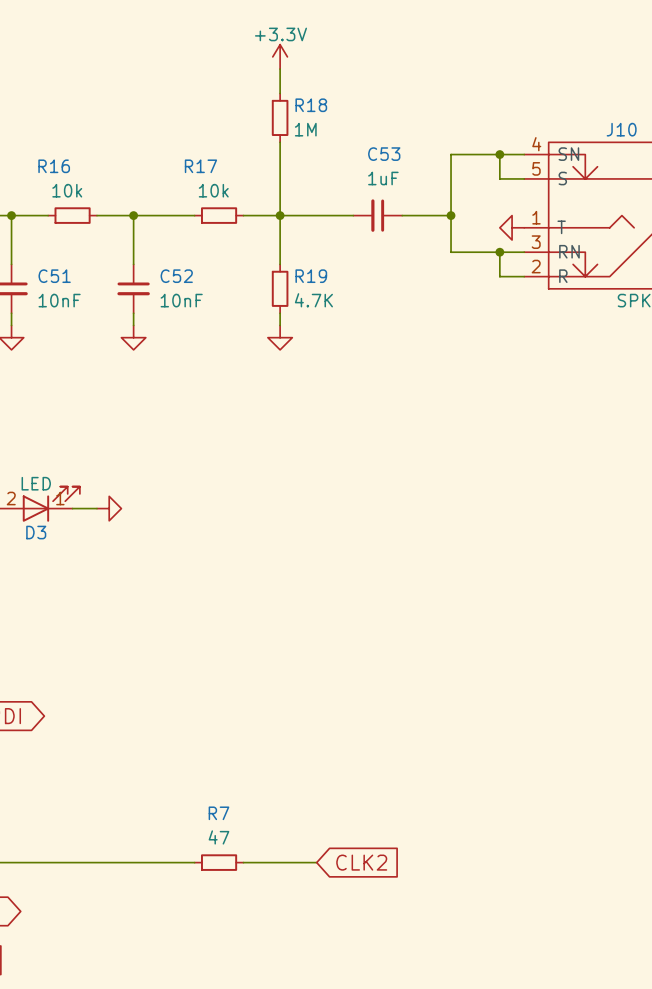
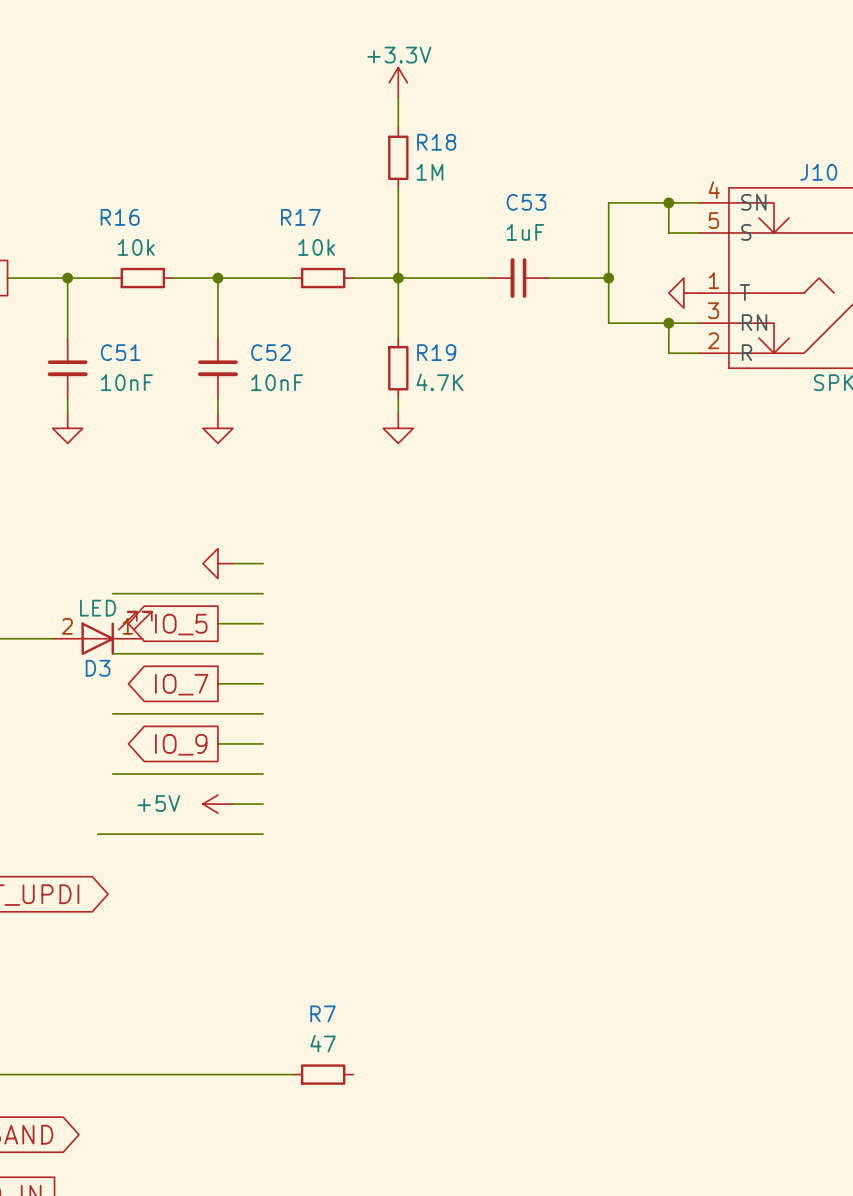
wire: none -> (112, 593) (263, 593)
wire: none -> (217, 623) (263, 623)
global label: none -> IO_5 (181, 624)
wire: (72, 508) (96, 508) -> (232, 563) (263, 563)
power symbol rotation: 0° (109, 508) -> 180° (217, 563)
power symbol position: (109, 508) -> (217, 563)
wire: none -> (112, 653) (263, 653)
global label: none -> IO_7 (181, 684)
wire: none -> (217, 683) (263, 683)
wire: none -> (112, 713) (263, 713)
global label: none -> IO_9 (181, 744)
wire: none -> (217, 743) (263, 743)
wire: none -> (112, 774) (263, 774)
power symbol: none -> +5V (217, 804)
wire: none -> (232, 804) (263, 804)
wire: none -> (97, 834) (263, 834)
wire: (243, 862) (316, 862) -> none
global label: CLK2 (361, 862) -> none

